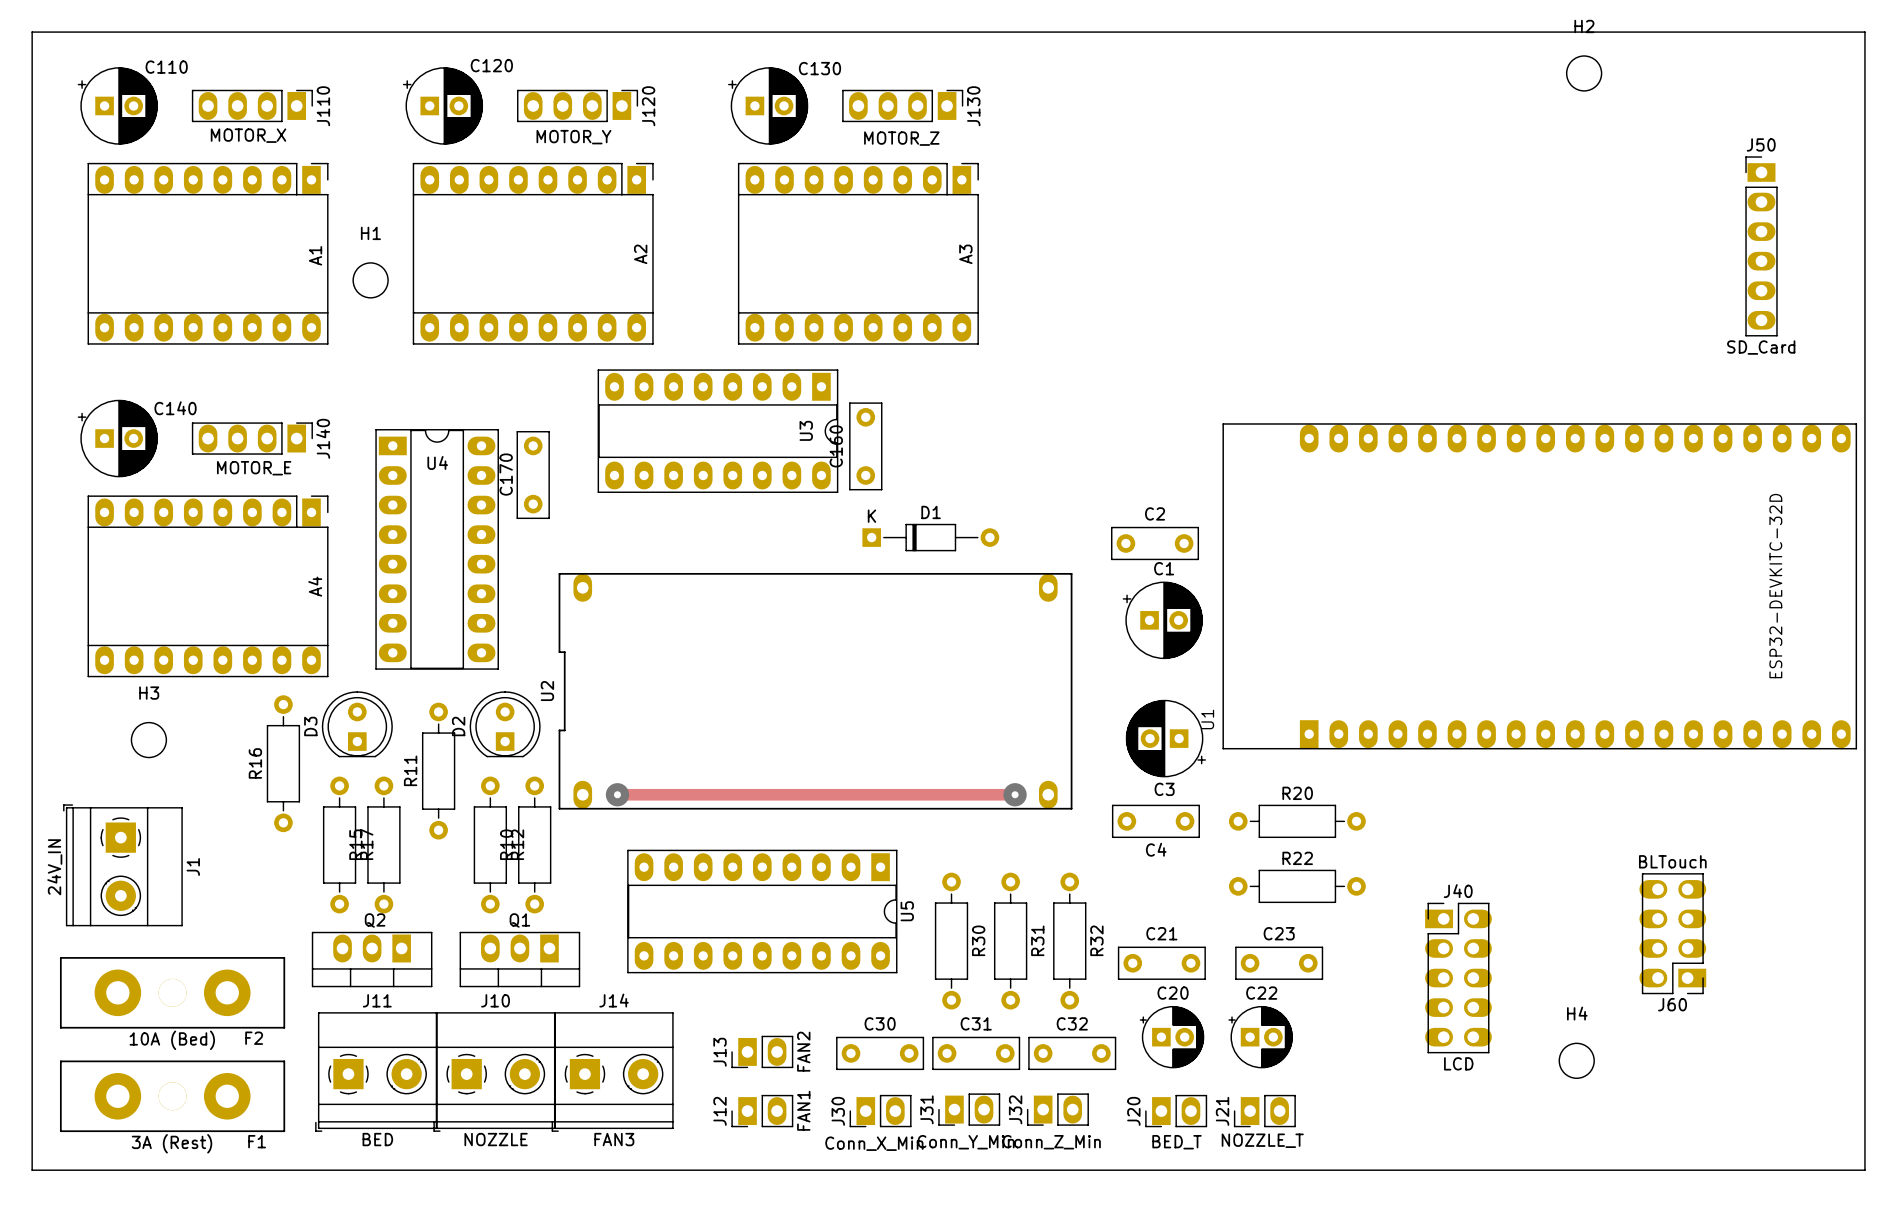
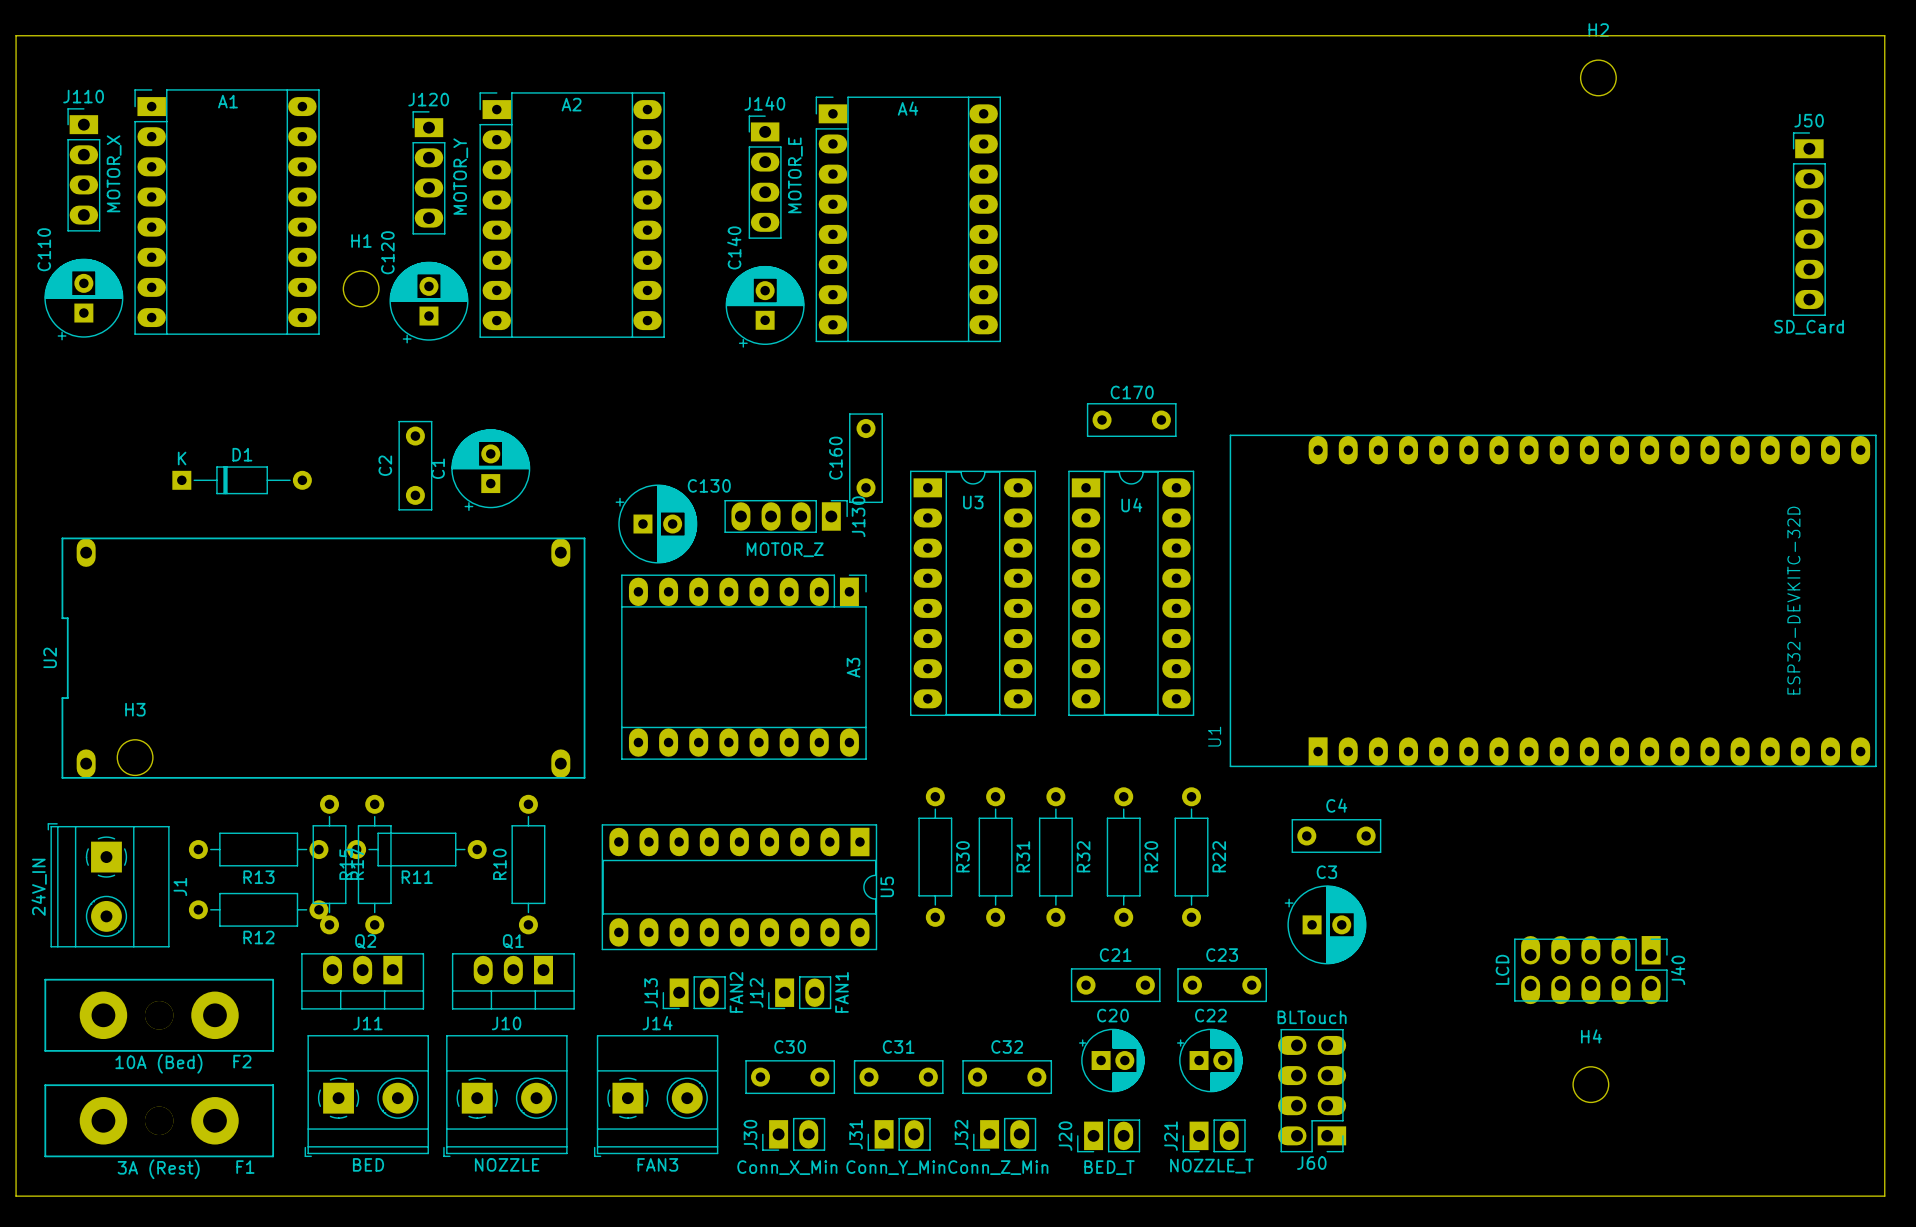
C110 rotation: 0° (117, 105) -> 90° counterclockwise (83, 299)
C110 position: (117, 105) -> (83, 299)
J110 rotation: 0° (252, 105) -> 90° counterclockwise (83, 169)
J110 position: (252, 105) -> (83, 169)
C120 rotation: 0° (442, 105) -> 90° counterclockwise (428, 302)
C120 position: (442, 105) -> (428, 302)
J120 rotation: 0° (577, 105) -> 90° counterclockwise (428, 172)
J120 position: (577, 105) -> (428, 172)
C130 position: (768, 105) -> (656, 524)
J130 position: (902, 105) -> (786, 516)
J50 position: (1761, 246) -> (1809, 224)
A1 rotation: 0° (208, 253) -> 90° counterclockwise (227, 212)
A2 rotation: 0° (533, 253) -> 90° counterclockwise (572, 215)
A3 position: (858, 253) -> (743, 667)
U3 rotation: 0° (717, 431) -> 90° counterclockwise (973, 593)
U3 position: (717, 431) -> (973, 593)
C140 rotation: 0° (117, 438) -> 90° counterclockwise (765, 306)
C140 position: (117, 438) -> (765, 306)
J140 rotation: 0° (252, 438) -> 90° counterclockwise (765, 177)
J140 position: (252, 438) -> (765, 177)
C170 rotation: 0° (533, 475) -> 90° clockwise (1131, 420)
C170 position: (533, 475) -> (1131, 420)
C2 name position: C2 (1155, 513) -> C2 (385, 465)
D1 position: (930, 537) -> (242, 480)
C2 rotation: 0° (1155, 543) -> 90° clockwise (415, 465)
C2 position: (1155, 543) -> (415, 465)
U4 position: (437, 549) -> (1131, 593)
A4 rotation: 0° (208, 586) -> 90° counterclockwise (908, 219)
A4 position: (208, 586) -> (908, 219)
C1 rotation: 0° (1162, 620) -> 90° counterclockwise (490, 470)
C1 position: (1162, 620) -> (490, 470)
U2 position: (815, 691) -> (323, 658)
D3: (357, 724) -> none
D2: (505, 724) -> none
C3 rotation: 0° (1165, 738) -> 180° (1325, 924)
C3 position: (1165, 738) -> (1325, 924)
R16: (283, 763) -> none
R11 name position: R11 (410, 770) -> R11 (417, 877)
R11 rotation: 0° (438, 771) -> 90° clockwise (416, 849)
track: (617, 794) (1015, 794) -> none
via: (617, 794) -> none
via: (1015, 794) -> none
C4 position: (1155, 821) -> (1336, 836)
R20 rotation: 0° (1297, 821) -> 90° clockwise (1123, 857)
R20 position: (1297, 821) -> (1123, 857)
R13: none -> (258, 849)
R12 rotation: 0° (490, 845) -> 90° clockwise (258, 909)
R12 position: (490, 845) -> (258, 909)
C4 name position: C4 (1156, 849) -> C4 (1336, 805)
R22 rotation: 0° (1297, 886) -> 90° clockwise (1191, 857)
R22 position: (1297, 886) -> (1191, 857)
U5 position: (762, 911) -> (739, 887)
J60 position: (1672, 933) -> (1312, 1090)
R30 position: (951, 941) -> (935, 857)
R31 position: (1010, 941) -> (995, 857)
R32 position: (1069, 941) -> (1055, 857)
C21 position: (1161, 963) -> (1115, 985)
C23 position: (1279, 963) -> (1222, 985)
J40 rotation: 0° (1458, 978) -> 90° clockwise (1590, 970)
J40 position: (1458, 978) -> (1590, 970)
C20 position: (1171, 1037) -> (1111, 1060)
C22 position: (1260, 1037) -> (1209, 1060)
J13 position: (762, 1051) -> (694, 992)
C30 position: (880, 1053) -> (790, 1077)
C31 position: (976, 1053) -> (898, 1077)
C32 position: (1072, 1053) -> (1007, 1077)
J10 position: (494, 1072) -> (505, 1096)
J14 position: (612, 1072) -> (656, 1096)
J31 position: (969, 1109) -> (899, 1134)
J32 position: (1057, 1109) -> (1004, 1134)
J12 position: (762, 1111) -> (799, 992)
J30 position: (880, 1111) -> (793, 1134)
J20 position: (1176, 1111) -> (1108, 1135)
J21 position: (1264, 1111) -> (1214, 1135)

